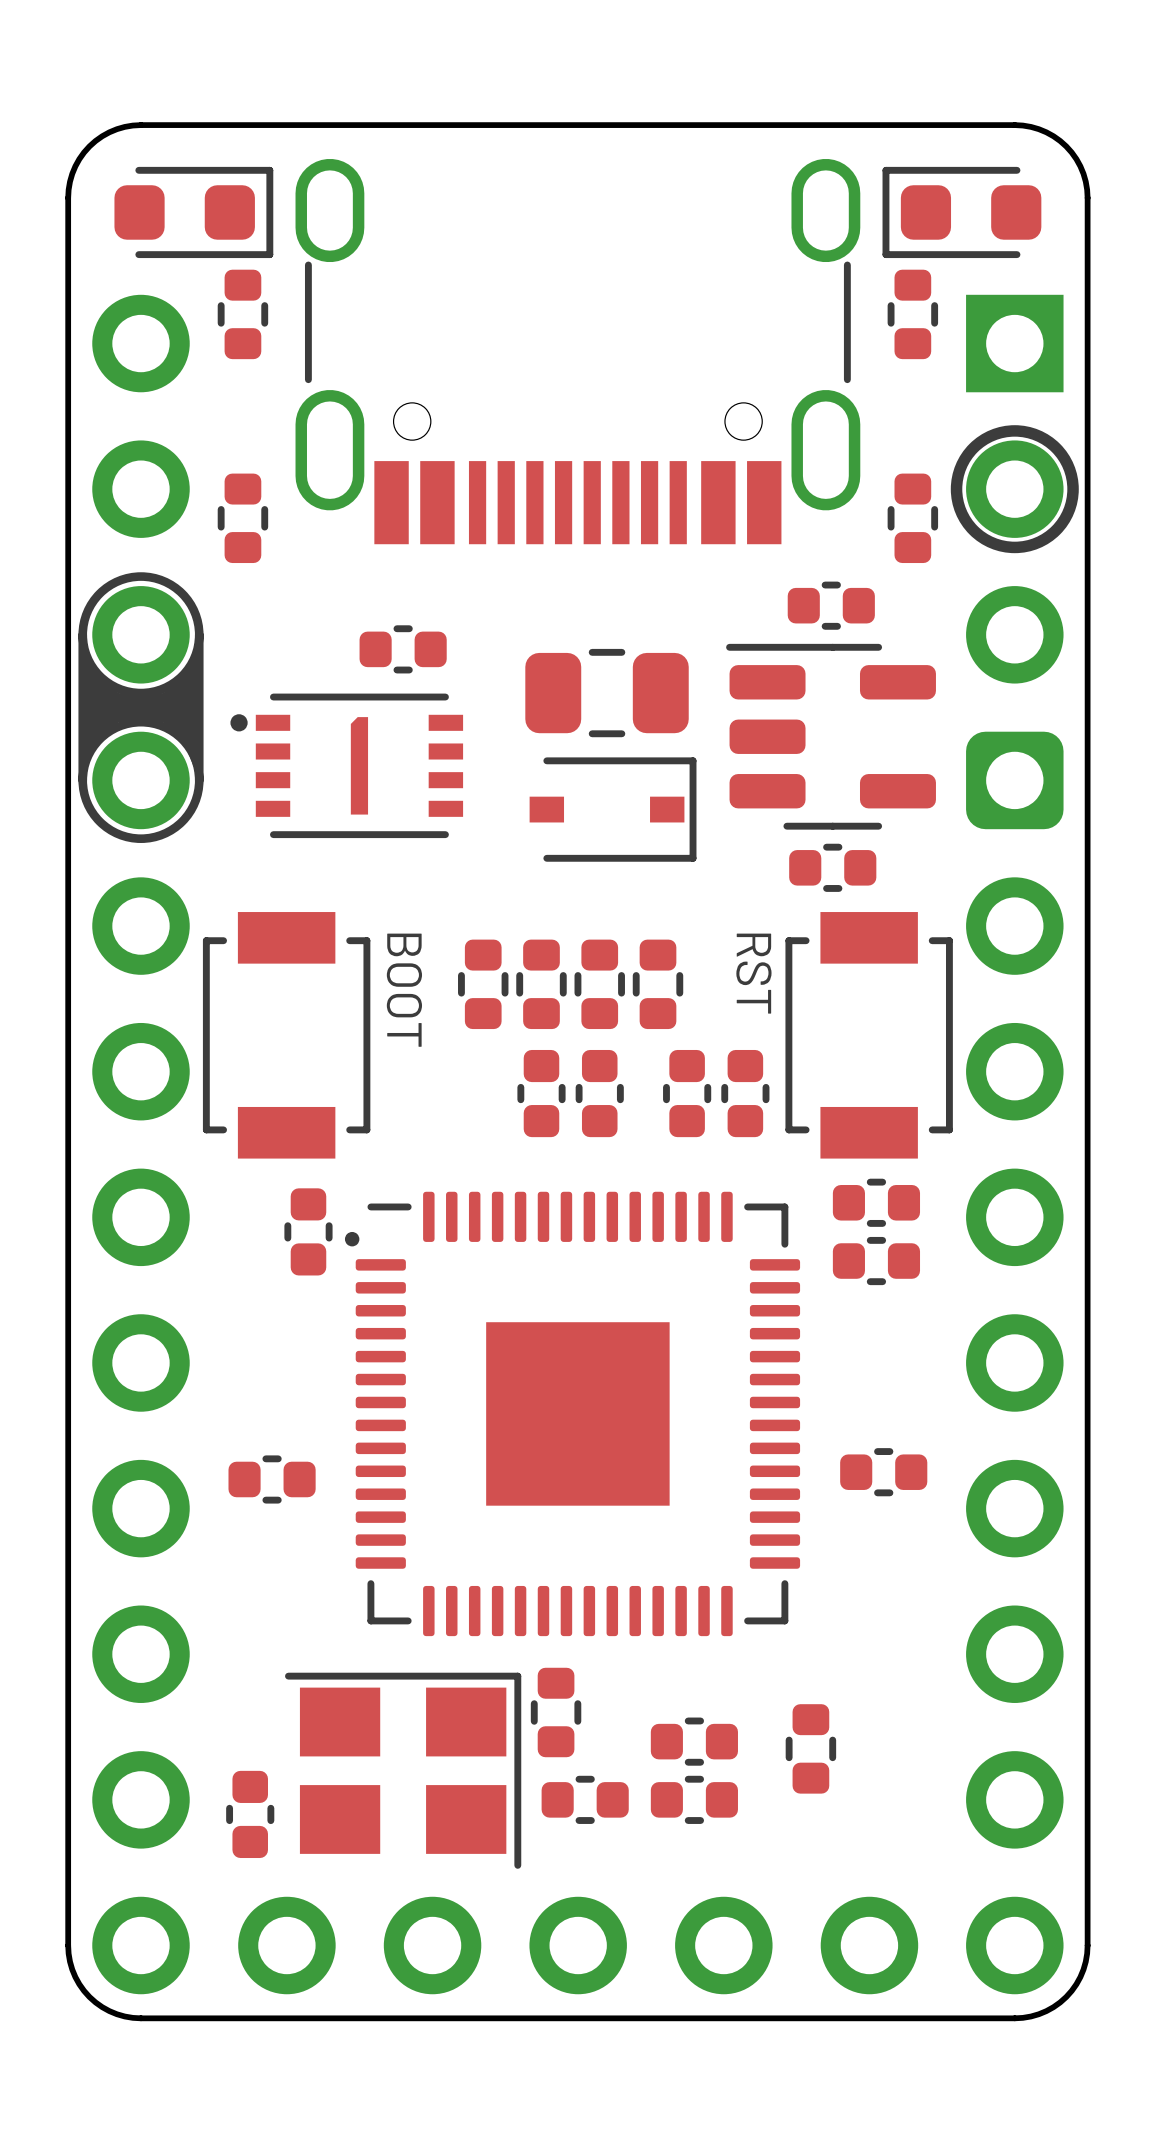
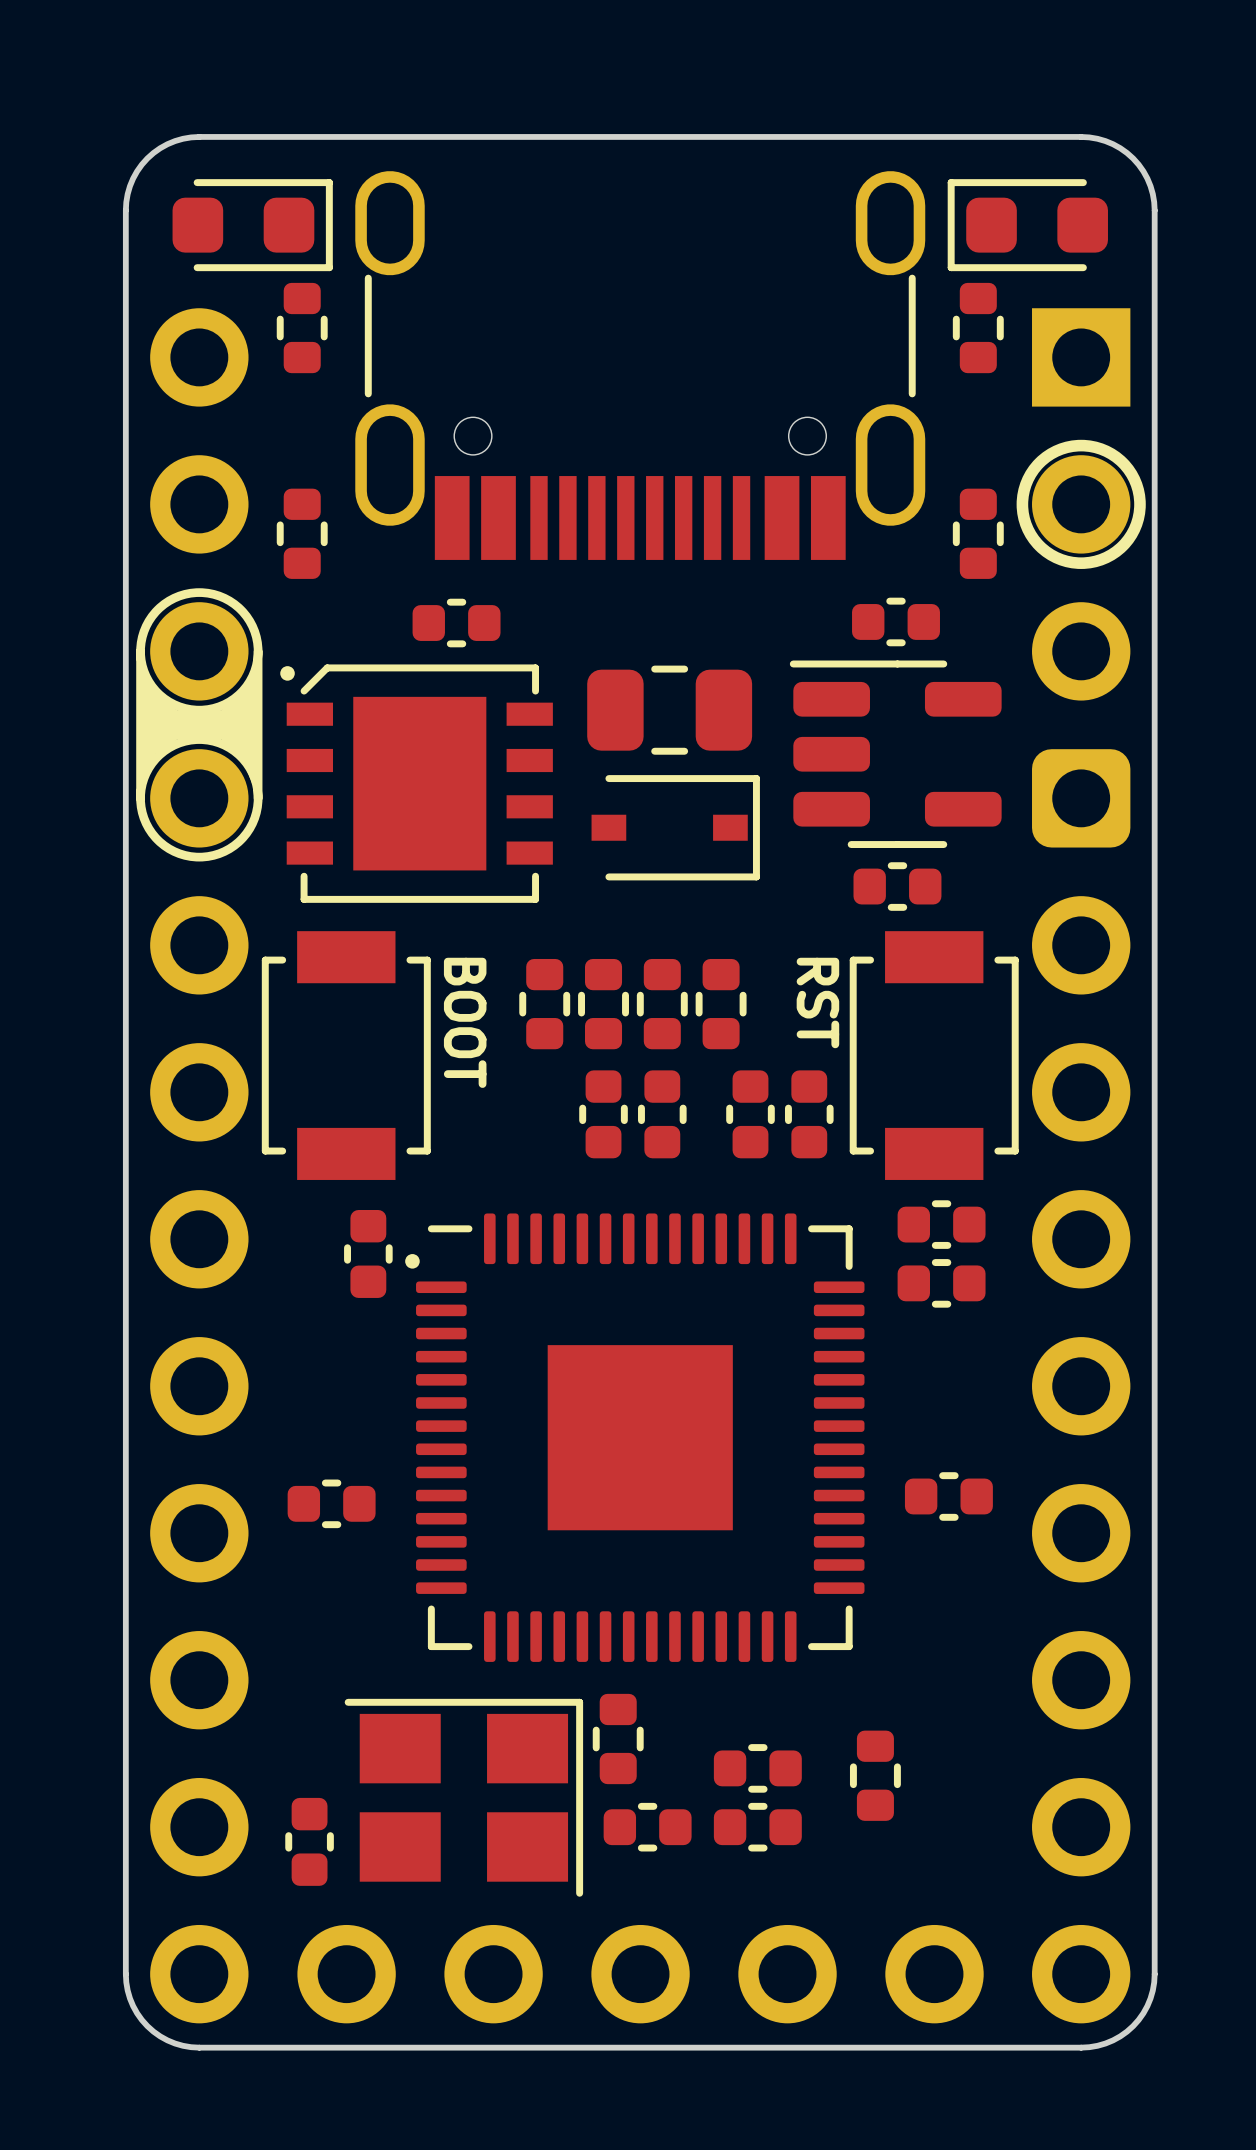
drawing: none -> [280, 666, 295, 681]
part position: (403, 649) -> (456, 623)
part footprint: [230, 693, 464, 839] -> [286, 664, 553, 903]

